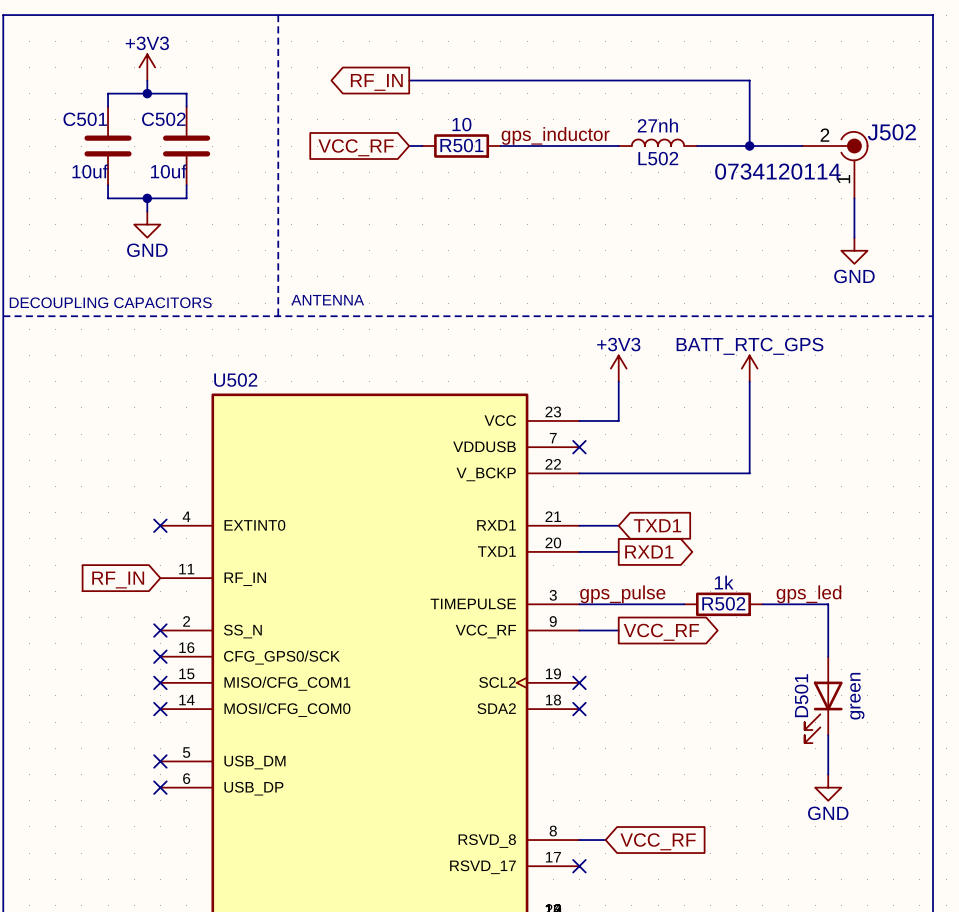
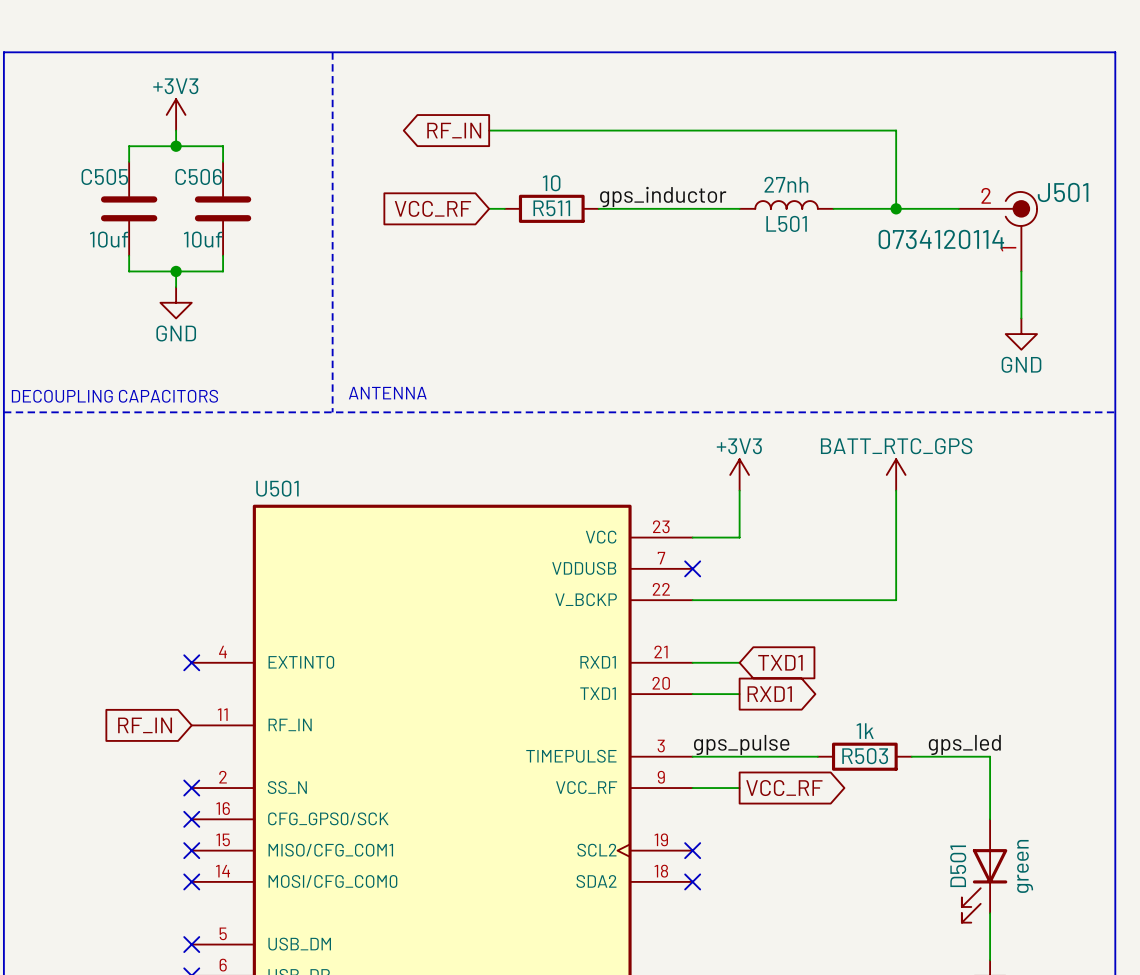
C501 name: C501 (85, 119) -> C505 (104, 176)
C502 name: C502 (163, 119) -> C506 (198, 176)
J502 name: J502 (891, 132) -> J501 (1063, 192)
R501 name: R501 (461, 145) -> R511 (551, 208)
L502 name: L502 (658, 158) -> L501 (786, 223)
U502 name: U502 (235, 380) -> U501 (277, 488)
R502 name: R502 (723, 603) -> R503 (865, 756)

